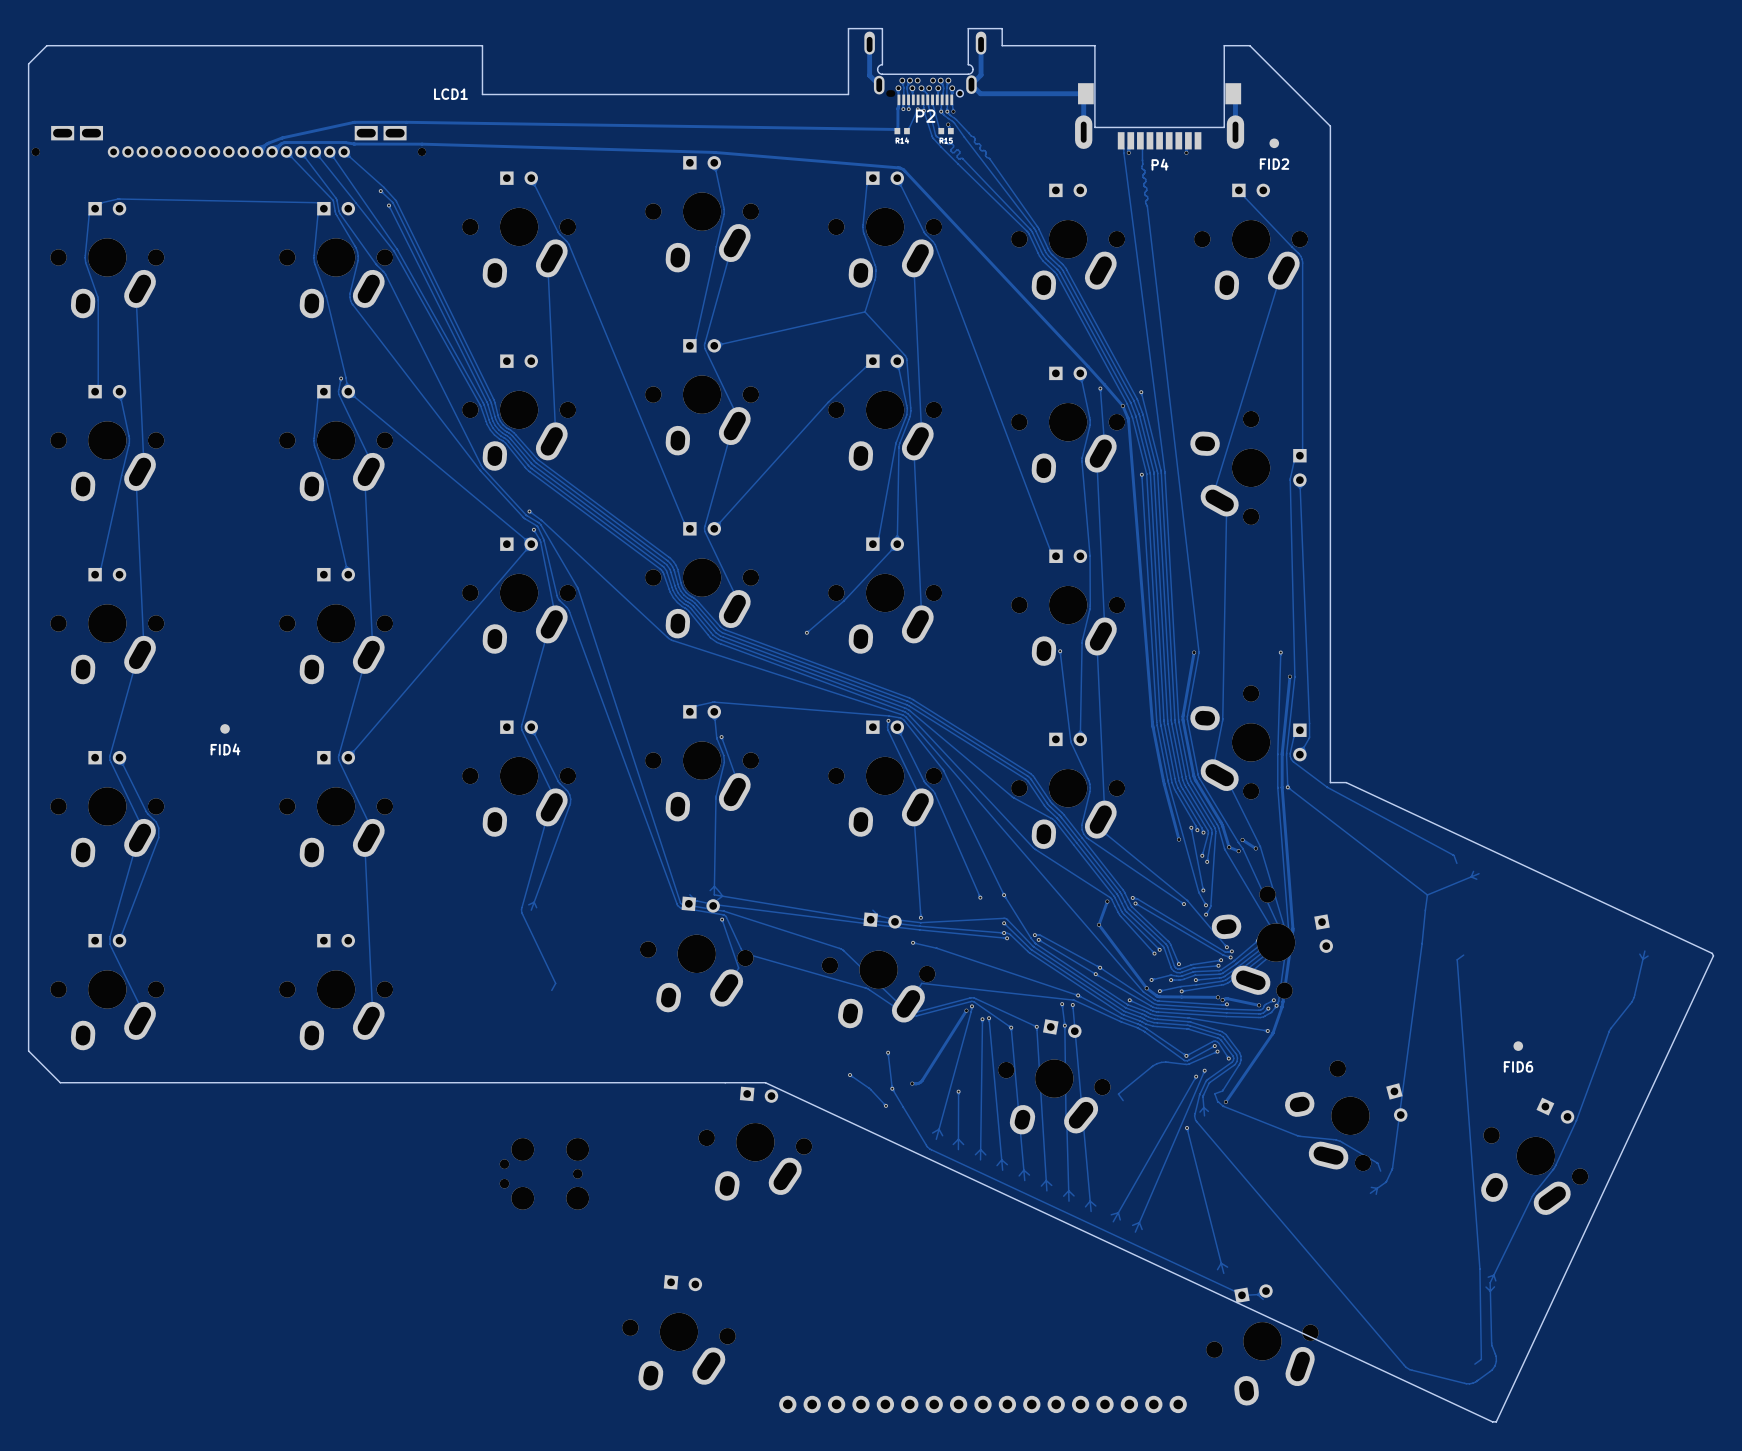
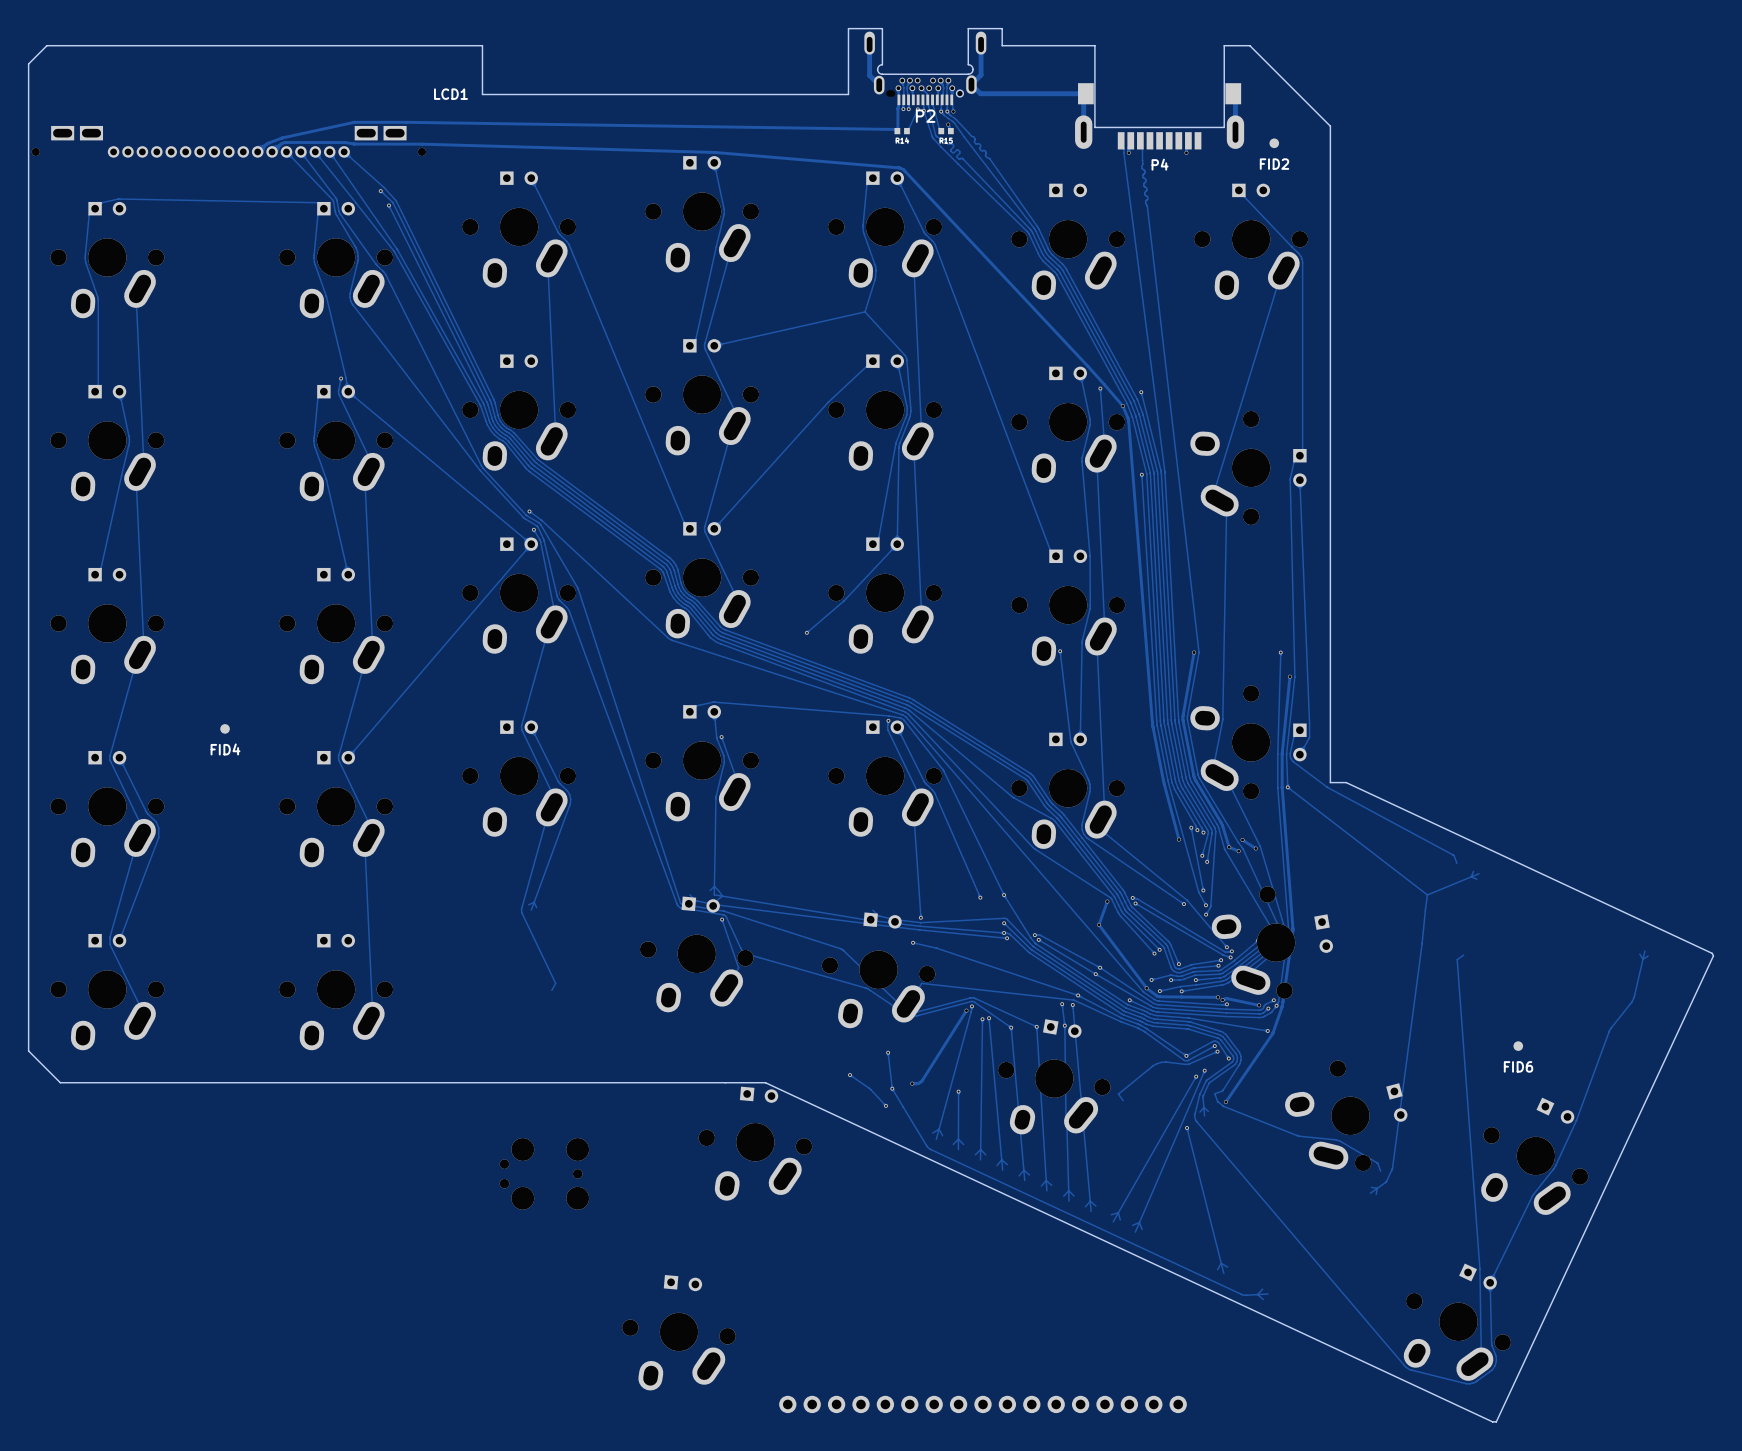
part: none -> (1478, 1276)
part: (1253, 1293) -> none
part: none -> (1457, 1336)
part: (1262, 1363) -> none

